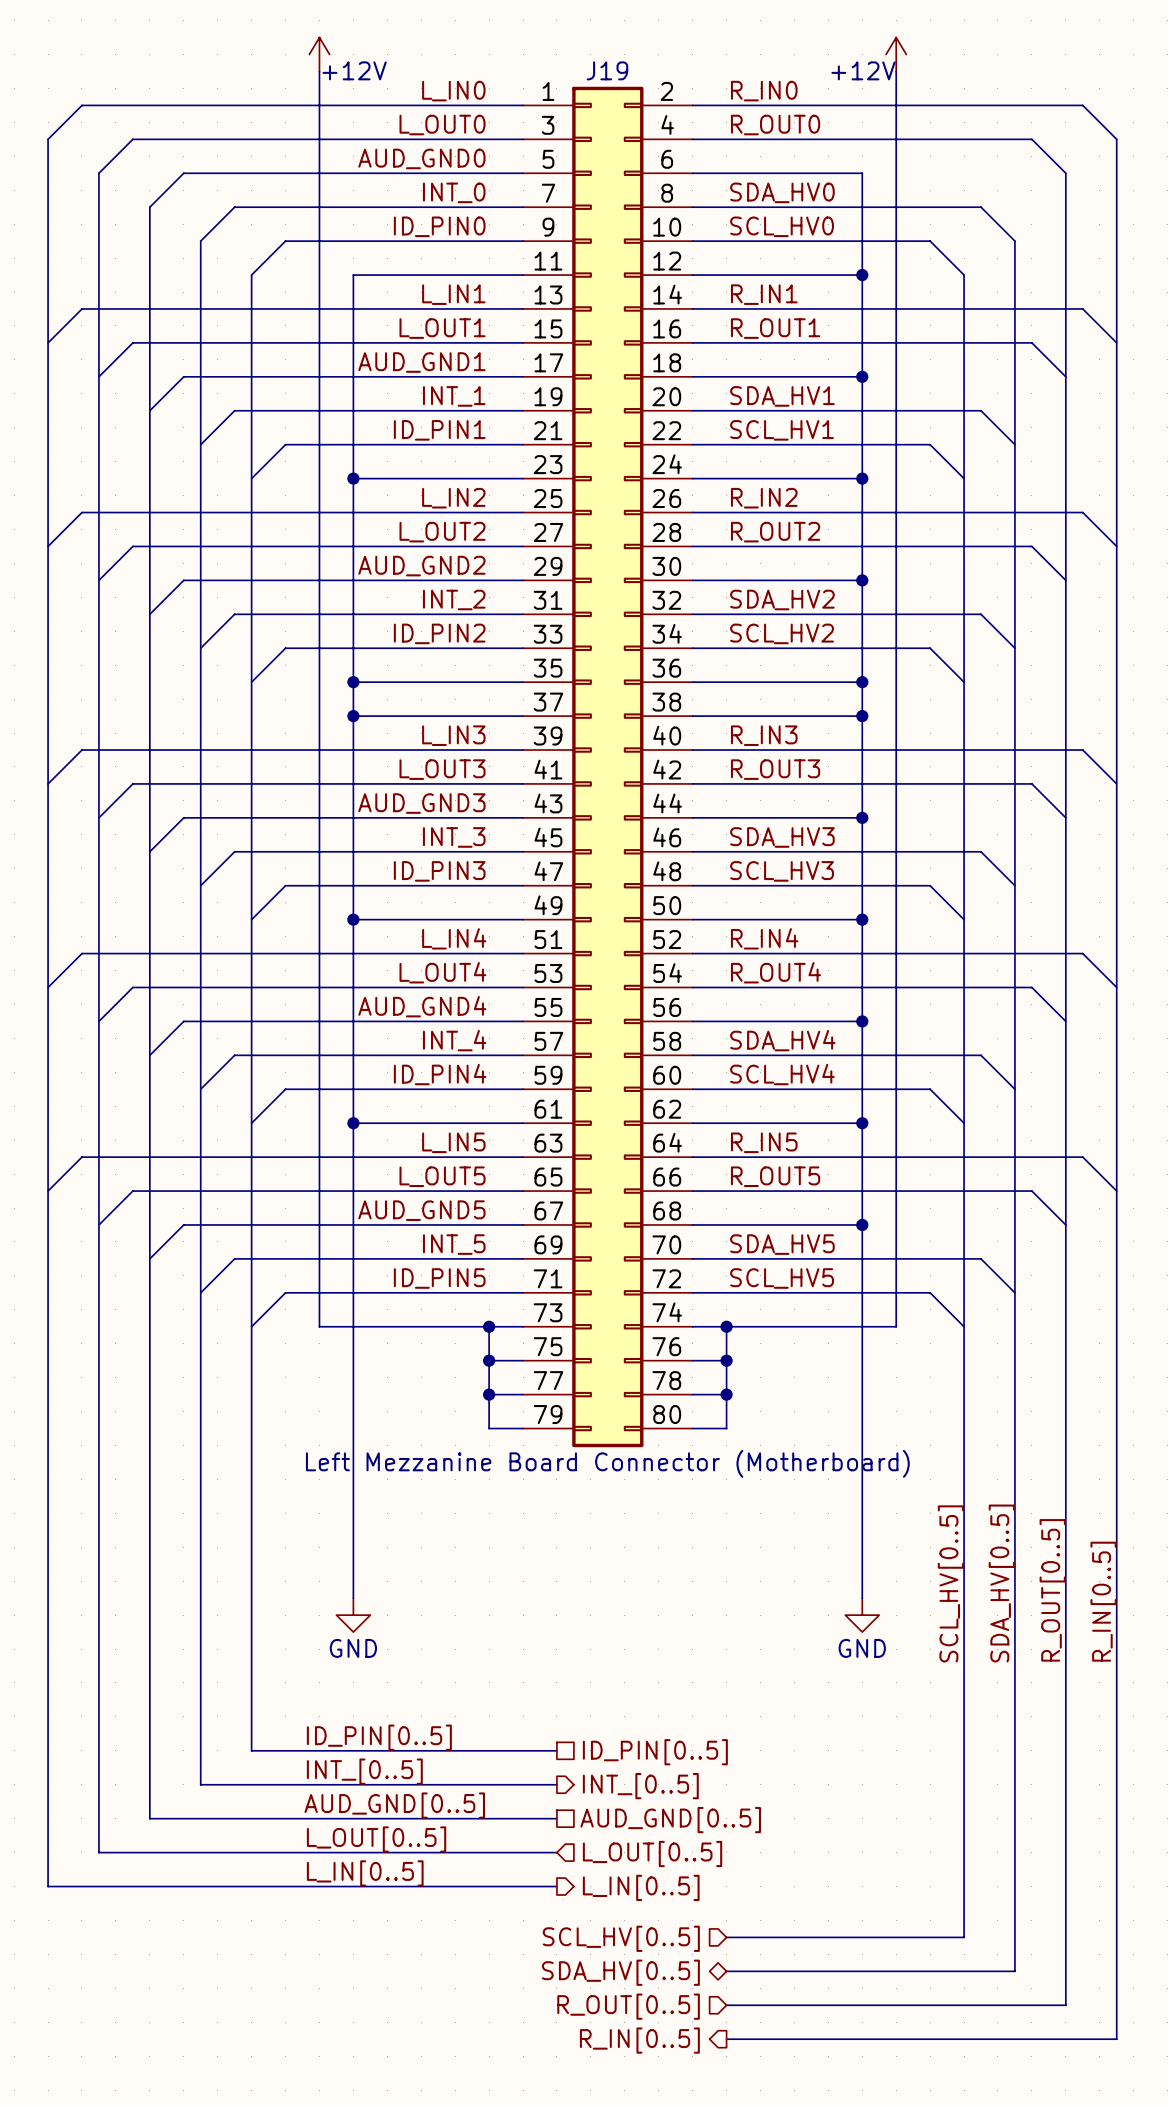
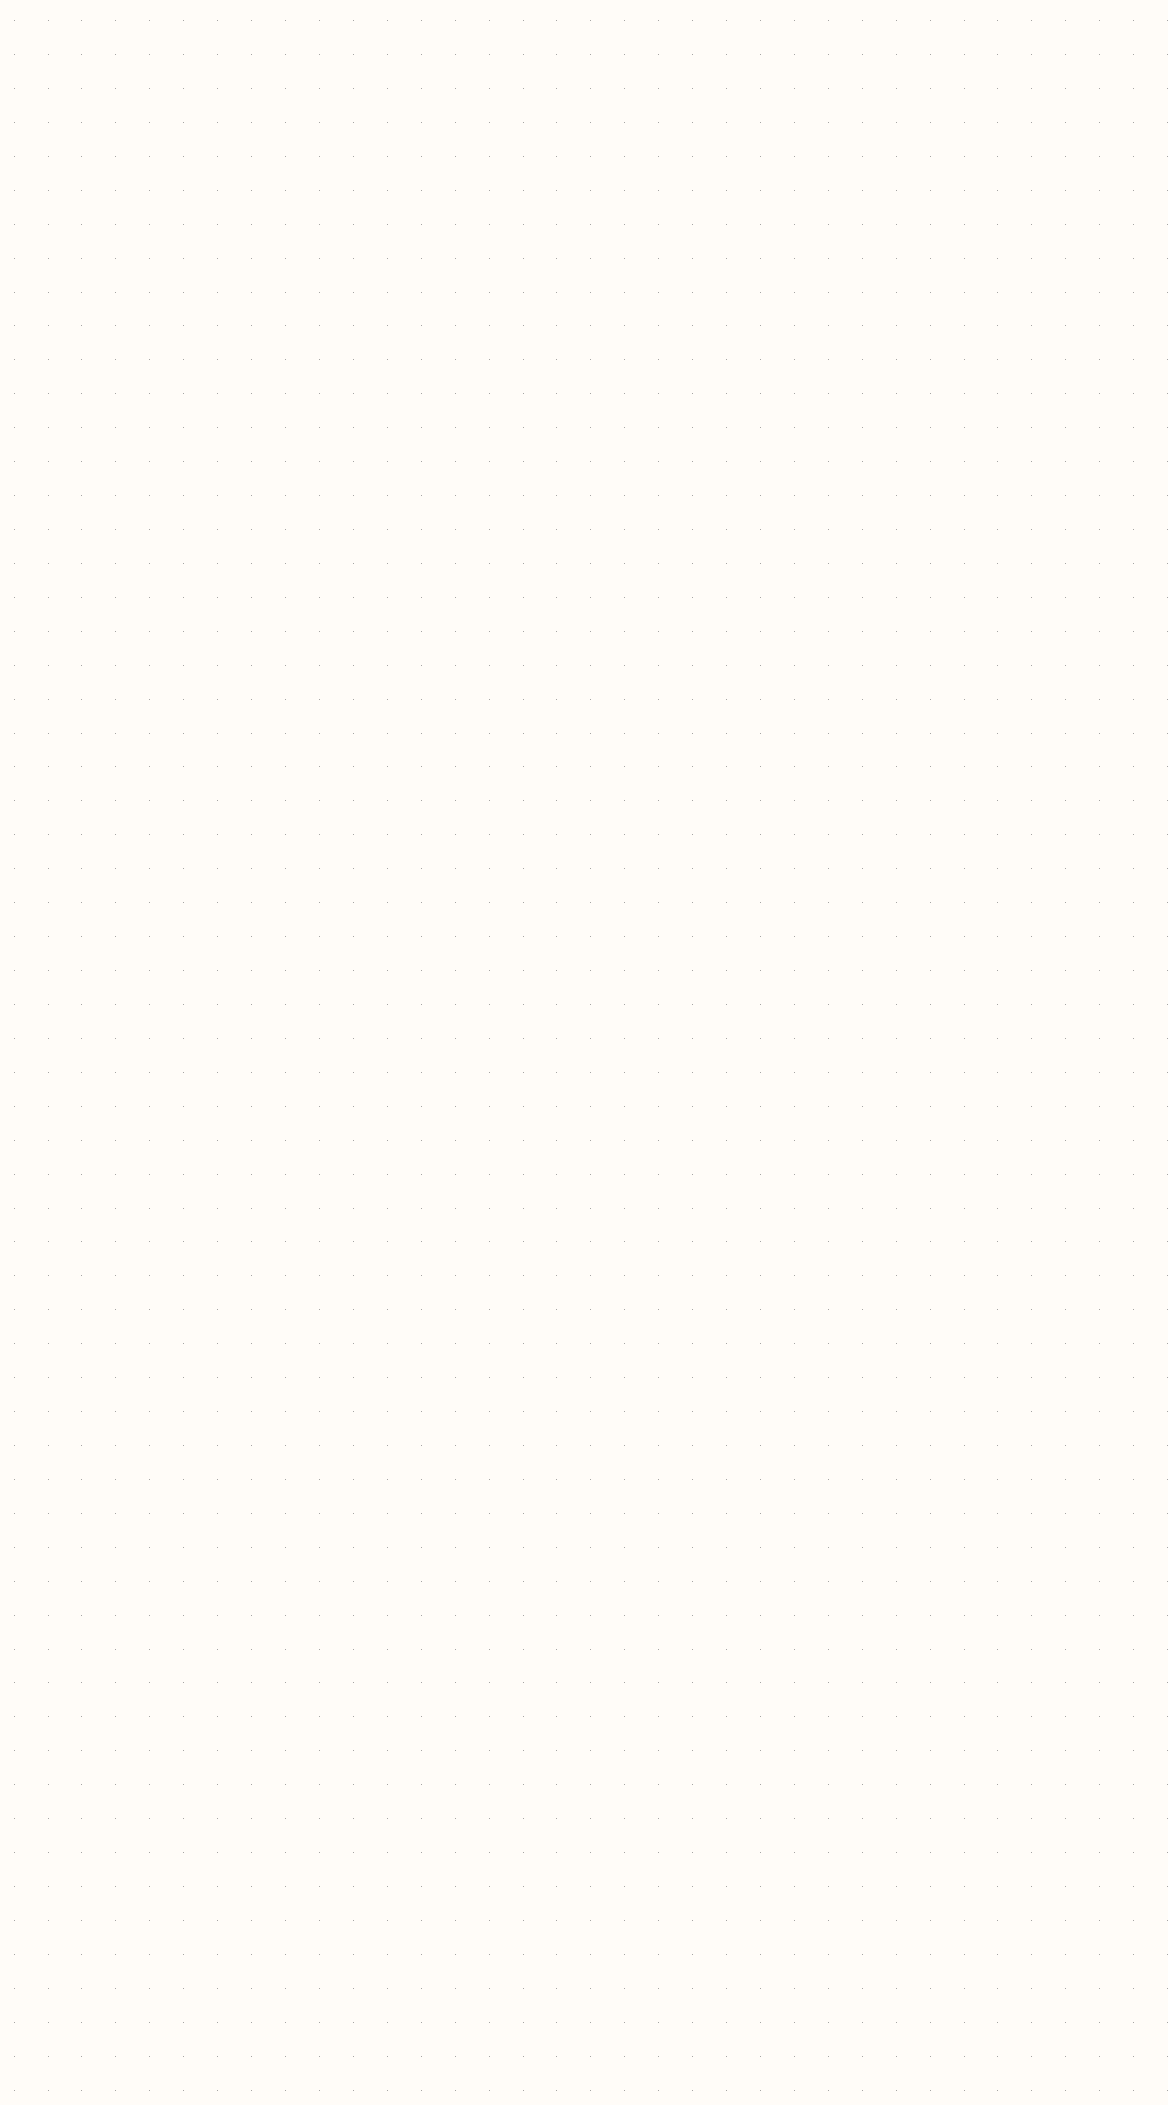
power symbol: +12V (319, 54) -> none
power symbol: +12V (896, 54) -> none
wire: (319, 71) (319, 1326) (523, 1326) -> none
wire: (896, 71) (896, 1326) (692, 1326) -> none
label: L_IN0 (453, 91) -> none
label: R_IN0 (764, 91) -> none
wire: (523, 105) (81, 105) (48, 139) -> none
wire: (692, 105) (1082, 105) (1116, 139) -> none
label: L_OUT0 (442, 125) -> none
label: R_OUT0 (775, 125) -> none
bus: (48, 139) (48, 1886) (556, 1886) -> none
wire: (523, 139) (132, 139) (98, 173) -> none
wire: (692, 139) (1031, 139) (1065, 173) -> none
bus: (1116, 139) (1116, 2039) (726, 2039) -> none
label: AUD_GND0 (421, 158) -> none
bus: (98, 173) (98, 1852) (556, 1852) -> none
wire: (523, 173) (183, 173) (149, 207) -> none
wire: (692, 173) (862, 173) (862, 1598) -> none
bus: (1065, 173) (1065, 2005) (726, 2005) -> none
label: INT_0 (454, 192) -> none
label: SDA_HV0 (782, 192) -> none
bus: (149, 207) (149, 1818) (556, 1818) -> none
wire: (523, 207) (234, 207) (200, 241) -> none
wire: (692, 207) (981, 207) (1014, 241) -> none
label: ID_PIN0 (439, 226) -> none
label: SCL_HV0 (782, 226) -> none
bus: (200, 241) (200, 1784) (556, 1784) -> none
wire: (523, 241) (285, 241) (251, 275) -> none
wire: (692, 241) (930, 241) (964, 275) -> none
bus: (1014, 241) (1014, 1971) (726, 1971) -> none
bus: (251, 275) (251, 1750) (556, 1750) -> none
wire: (523, 275) (353, 275) (353, 1598) -> none
wire: (692, 275) (862, 275) -> none
junction: (862, 275) -> none
bus: (964, 275) (964, 1937) (726, 1937) -> none
label: L_IN1 (453, 294) -> none
label: R_IN1 (764, 294) -> none
wire: (523, 308) (81, 308) (48, 342) -> none
wire: (692, 308) (1082, 308) (1116, 342) -> none
label: L_OUT1 (442, 328) -> none
label: R_OUT1 (775, 328) -> none
wire: (523, 342) (132, 342) (98, 376) -> none
wire: (692, 342) (1031, 342) (1065, 376) -> none
label: AUD_GND1 (421, 362) -> none
wire: (523, 376) (183, 376) (149, 410) -> none
wire: (692, 376) (862, 376) -> none
junction: (862, 376) -> none
label: INT_1 (454, 396) -> none
label: SDA_HV1 (782, 396) -> none
wire: (523, 410) (234, 410) (200, 444) -> none
wire: (692, 410) (981, 410) (1014, 444) -> none
label: ID_PIN1 (439, 430) -> none
label: SCL_HV1 (782, 430) -> none
wire: (523, 444) (285, 444) (251, 478) -> none
wire: (692, 444) (930, 444) (964, 478) -> none
wire: (353, 478) (523, 478) -> none
junction: (353, 478) -> none
wire: (692, 478) (862, 478) -> none
junction: (862, 478) -> none
label: L_IN2 (453, 498) -> none
label: R_IN2 (764, 498) -> none
wire: (523, 512) (81, 512) (48, 546) -> none
wire: (692, 512) (1082, 512) (1116, 546) -> none
label: L_OUT2 (442, 532) -> none
label: R_OUT2 (775, 532) -> none
wire: (523, 546) (132, 546) (98, 580) -> none
wire: (692, 546) (1031, 546) (1065, 580) -> none
label: AUD_GND2 (421, 566) -> none
wire: (523, 580) (183, 580) (149, 614) -> none
wire: (692, 580) (862, 580) -> none
junction: (862, 580) -> none
label: INT_2 (454, 599) -> none
label: SDA_HV2 (782, 599) -> none
wire: (523, 614) (234, 614) (200, 648) -> none
wire: (692, 614) (981, 614) (1014, 648) -> none
label: ID_PIN2 (439, 633) -> none
label: SCL_HV2 (782, 633) -> none
wire: (523, 648) (285, 648) (251, 682) -> none
wire: (692, 648) (930, 648) (964, 682) -> none
wire: (353, 682) (523, 682) -> none
junction: (353, 682) -> none
wire: (692, 682) (862, 682) -> none
junction: (862, 682) -> none
wire: (353, 716) (523, 716) -> none
junction: (353, 716) -> none
wire: (692, 716) (862, 716) -> none
junction: (862, 716) -> none
label: L_IN3 (453, 735) -> none
label: R_IN3 (764, 735) -> none
wire: (523, 750) (81, 750) (48, 783) -> none
wire: (692, 750) (1082, 750) (1116, 783) -> none
J19: Left Mezzanine Board Connector (Motherboard) (607, 766) -> none
label: L_OUT3 (442, 769) -> none
label: R_OUT3 (775, 769) -> none
wire: (523, 783) (132, 783) (98, 817) -> none
wire: (692, 783) (1031, 783) (1065, 817) -> none
label: AUD_GND3 (421, 803) -> none
wire: (523, 817) (183, 817) (149, 851) -> none
wire: (692, 817) (862, 817) -> none
junction: (862, 817) -> none
label: INT_3 (454, 837) -> none
label: SDA_HV3 (782, 837) -> none
wire: (523, 851) (234, 851) (200, 885) -> none
wire: (692, 851) (981, 851) (1014, 885) -> none
label: ID_PIN3 (439, 871) -> none
label: SCL_HV3 (782, 871) -> none
wire: (523, 885) (285, 885) (251, 919) -> none
wire: (692, 885) (930, 885) (964, 919) -> none
wire: (353, 919) (523, 919) -> none
junction: (353, 919) -> none
wire: (692, 919) (862, 919) -> none
junction: (862, 919) -> none
label: L_IN4 (454, 938) -> none
label: R_IN4 (764, 938) -> none
wire: (523, 953) (81, 953) (48, 987) -> none
wire: (692, 953) (1082, 953) (1116, 987) -> none
label: L_OUT4 (442, 972) -> none
label: R_OUT4 (775, 972) -> none
wire: (523, 987) (132, 987) (98, 1021) -> none
wire: (692, 987) (1031, 987) (1065, 1021) -> none
label: AUD_GND4 (422, 1006) -> none
wire: (523, 1021) (183, 1021) (149, 1055) -> none
wire: (692, 1021) (862, 1021) -> none
junction: (862, 1021) -> none
label: INT_4 (454, 1040) -> none
label: SDA_HV4 (782, 1040) -> none
wire: (523, 1055) (234, 1055) (200, 1089) -> none
wire: (692, 1055) (981, 1055) (1014, 1089) -> none
label: ID_PIN4 (440, 1074) -> none
label: SCL_HV4 (782, 1074) -> none
wire: (523, 1089) (285, 1089) (251, 1123) -> none
wire: (692, 1089) (930, 1089) (964, 1123) -> none
wire: (353, 1123) (523, 1123) -> none
junction: (353, 1123) -> none
wire: (692, 1123) (862, 1123) -> none
junction: (862, 1123) -> none
label: L_IN5 (453, 1142) -> none
label: R_IN5 (764, 1142) -> none
wire: (523, 1157) (81, 1157) (48, 1191) -> none
wire: (692, 1157) (1082, 1157) (1116, 1191) -> none
label: L_OUT5 (442, 1176) -> none
label: R_OUT5 (775, 1176) -> none
wire: (523, 1191) (132, 1191) (98, 1224) -> none
wire: (692, 1191) (1031, 1191) (1065, 1224) -> none
label: AUD_GND5 (421, 1210) -> none
wire: (523, 1224) (183, 1224) (149, 1258) -> none
wire: (692, 1224) (862, 1224) -> none
junction: (862, 1224) -> none
label: INT_5 (454, 1244) -> none
label: SDA_HV5 (782, 1244) -> none
wire: (523, 1258) (234, 1258) (200, 1292) -> none
wire: (692, 1258) (981, 1258) (1014, 1292) -> none
label: ID_PIN5 (439, 1278) -> none
label: SCL_HV5 (782, 1278) -> none
wire: (523, 1292) (285, 1292) (251, 1326) -> none
wire: (692, 1292) (930, 1292) (964, 1326) -> none
wire: (489, 1326) (489, 1428) (523, 1428) -> none
junction: (489, 1326) -> none
wire: (726, 1326) (726, 1428) (692, 1428) -> none
junction: (726, 1326) -> none
wire: (489, 1360) (523, 1360) -> none
junction: (489, 1360) -> none
wire: (692, 1360) (726, 1360) -> none
junction: (726, 1360) -> none
wire: (489, 1394) (523, 1394) -> none
junction: (489, 1394) -> none
wire: (692, 1394) (726, 1394) -> none
junction: (726, 1394) -> none
label: SCL_HV[0..5] (950, 1583) -> none
label: SDA_HV[0..5] (1001, 1583) -> none
label: R_OUT[0..5] (1052, 1590) -> none
label: R_IN[0..5] (1103, 1601) -> none
power symbol: GND (353, 1615) -> none
power symbol: GND (862, 1615) -> none
label: ID_PIN[0..5] (379, 1737) -> none
hierarchical label: ID_PIN[0..5] (655, 1752) -> none
label: INT_[0..5] (364, 1771) -> none
hierarchical label: INT_[0..5] (640, 1786) -> none
label: AUD_GND[0..5] (394, 1805) -> none
hierarchical label: AUD_GND[0..5] (670, 1820) -> none
label: L_OUT[0..5] (376, 1839) -> none
hierarchical label: L_OUT[0..5] (652, 1853) -> none
label: L_IN[0..5] (365, 1873) -> none
hierarchical label: L_IN[0..5] (641, 1887) -> none
hierarchical label: SCL_HV[0..5] (621, 1938) -> none
hierarchical label: SDA_HV[0..5] (620, 1972) -> none
hierarchical label: R_OUT[0..5] (628, 2006) -> none
hierarchical label: R_IN[0..5] (639, 2040) -> none

